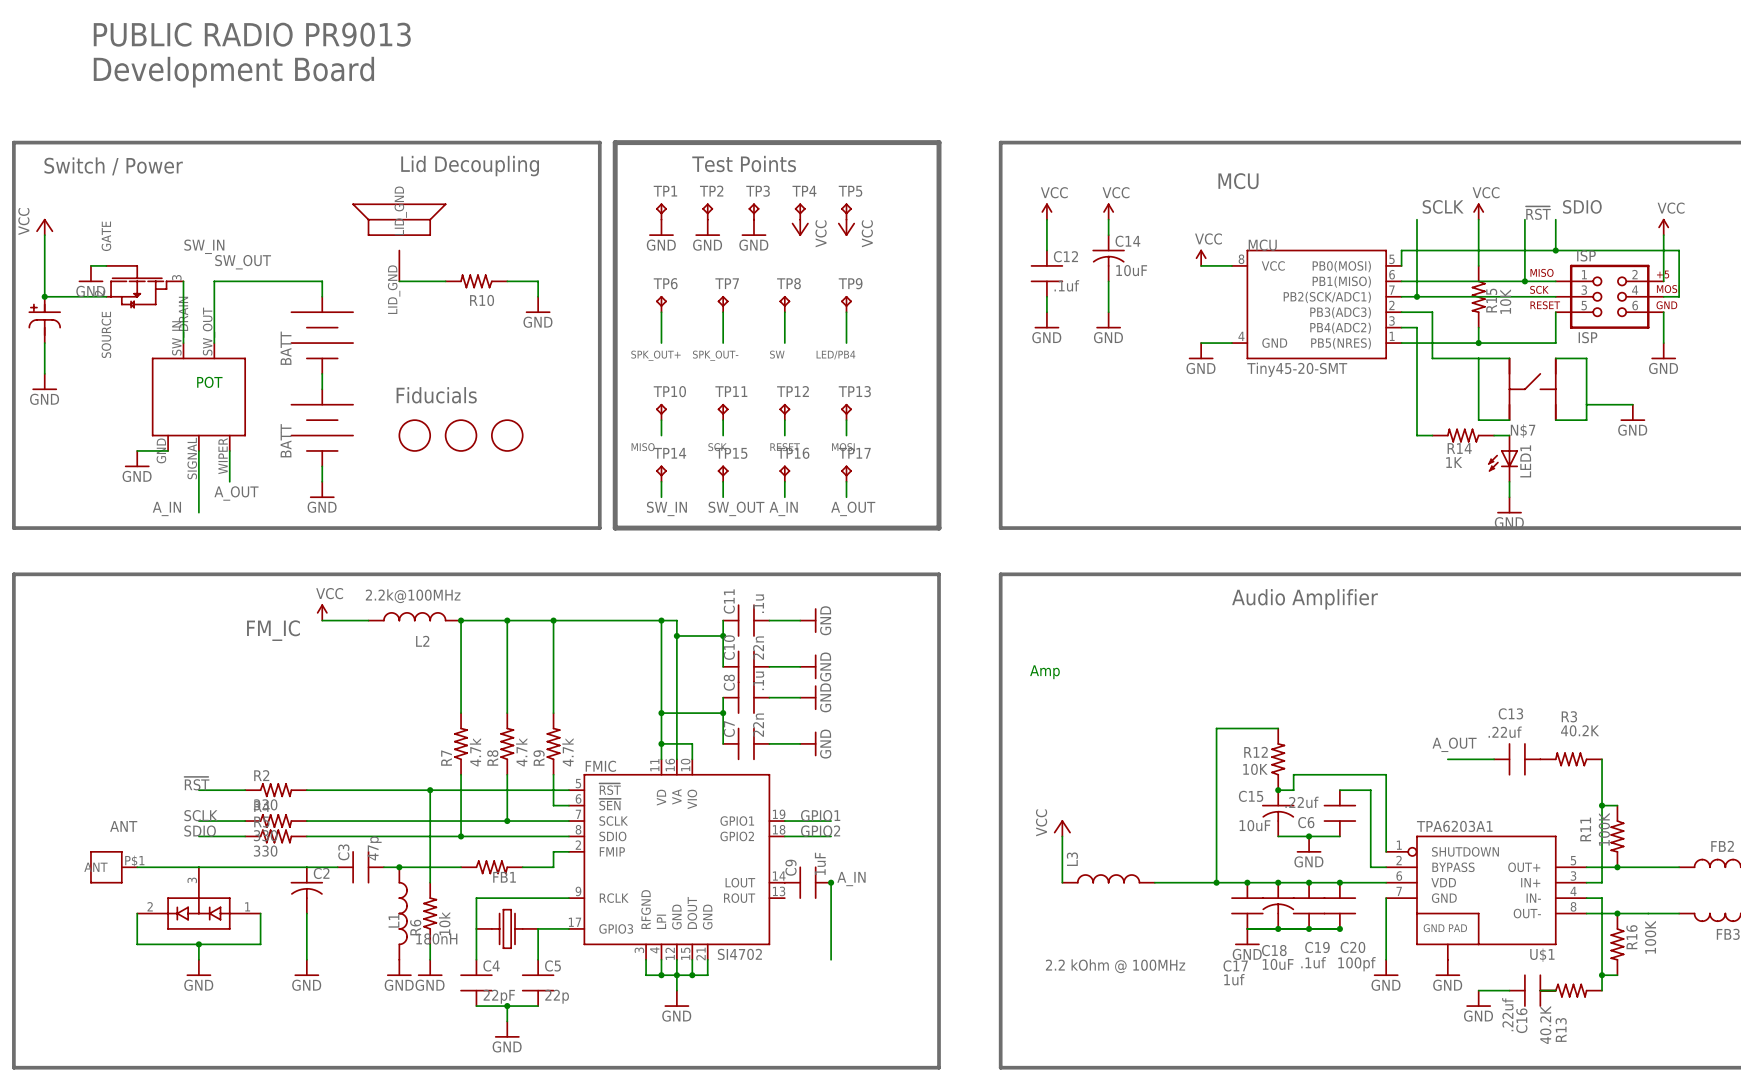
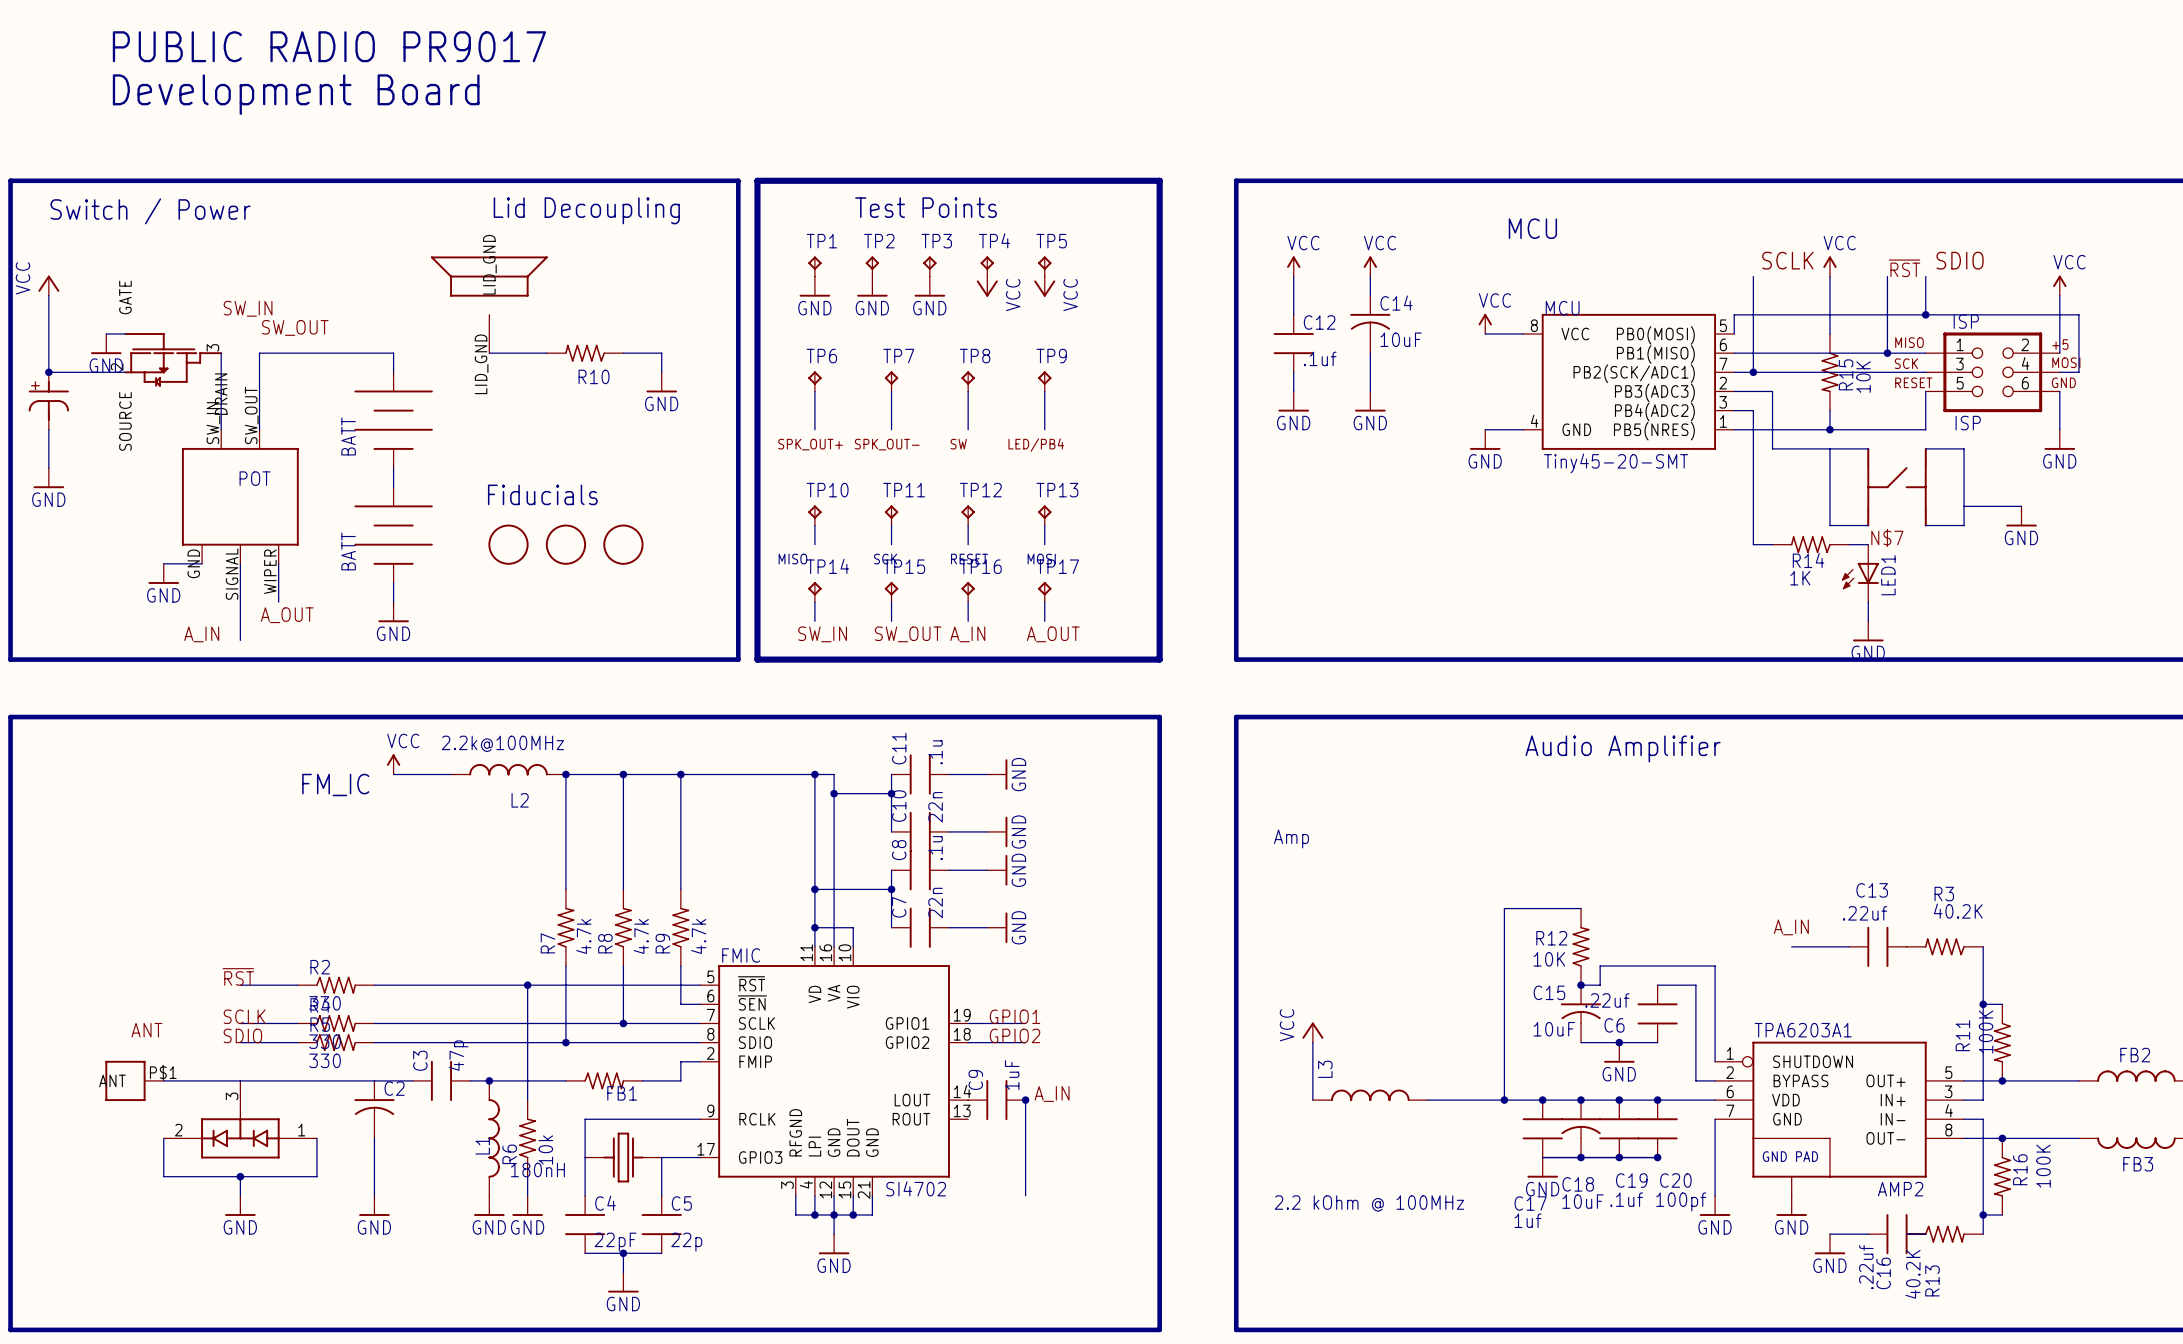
text: PUBLIC RADIO PR9013 (252, 34) -> PUBLIC RADIO PR9017 (329, 46)
label: A_OUT (1454, 744) -> A_IN (1791, 927)
U$1 name: U$1 (1542, 955) -> AMP2 (1900, 1189)

